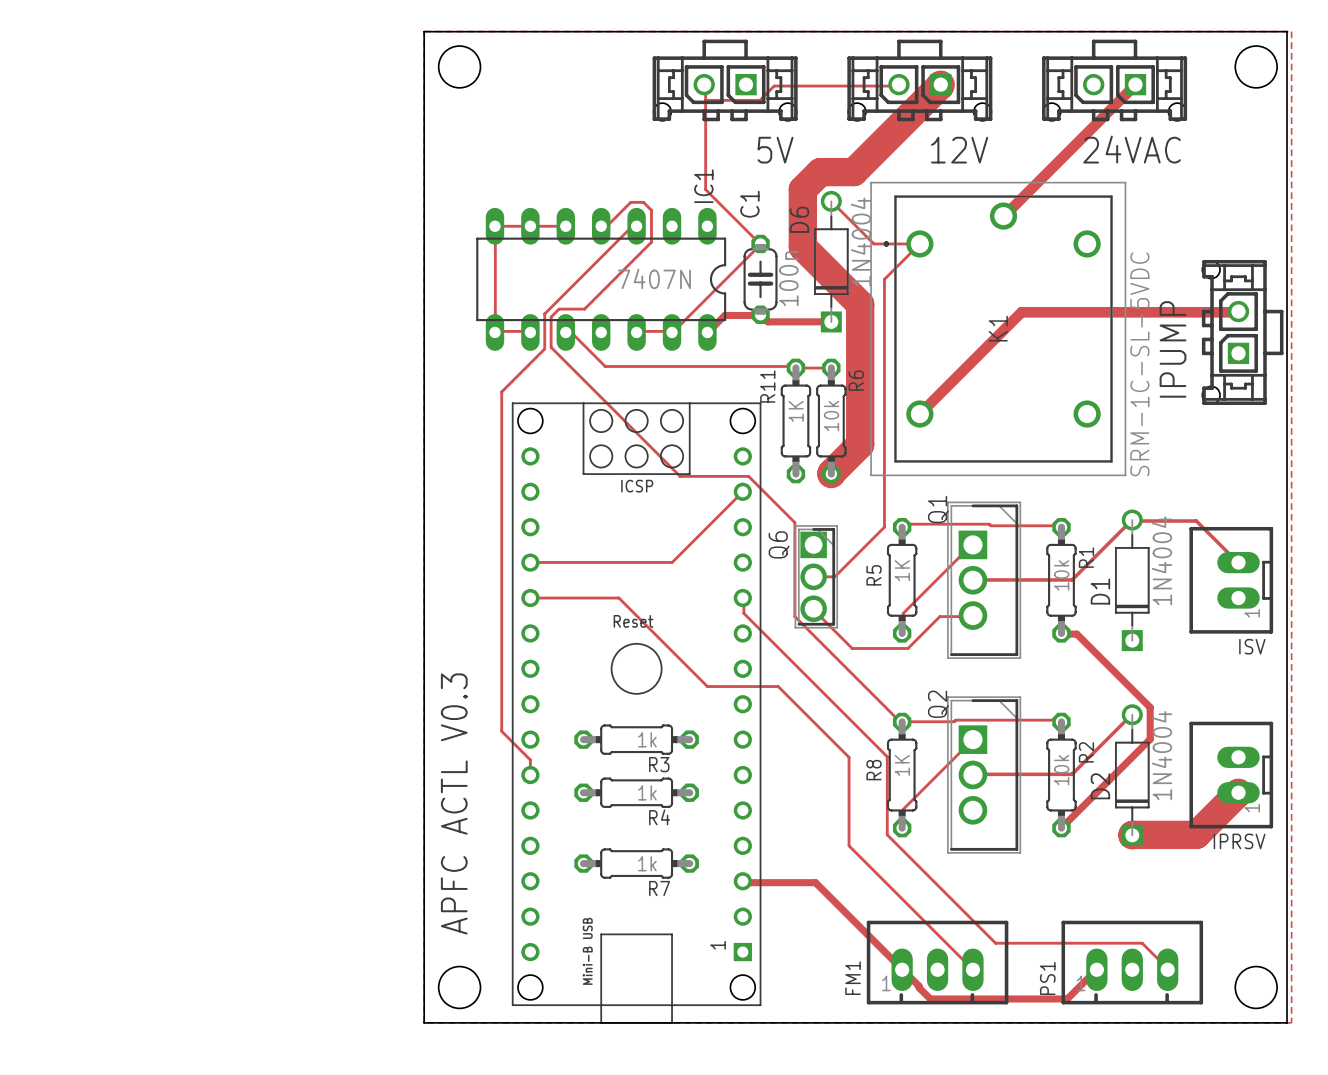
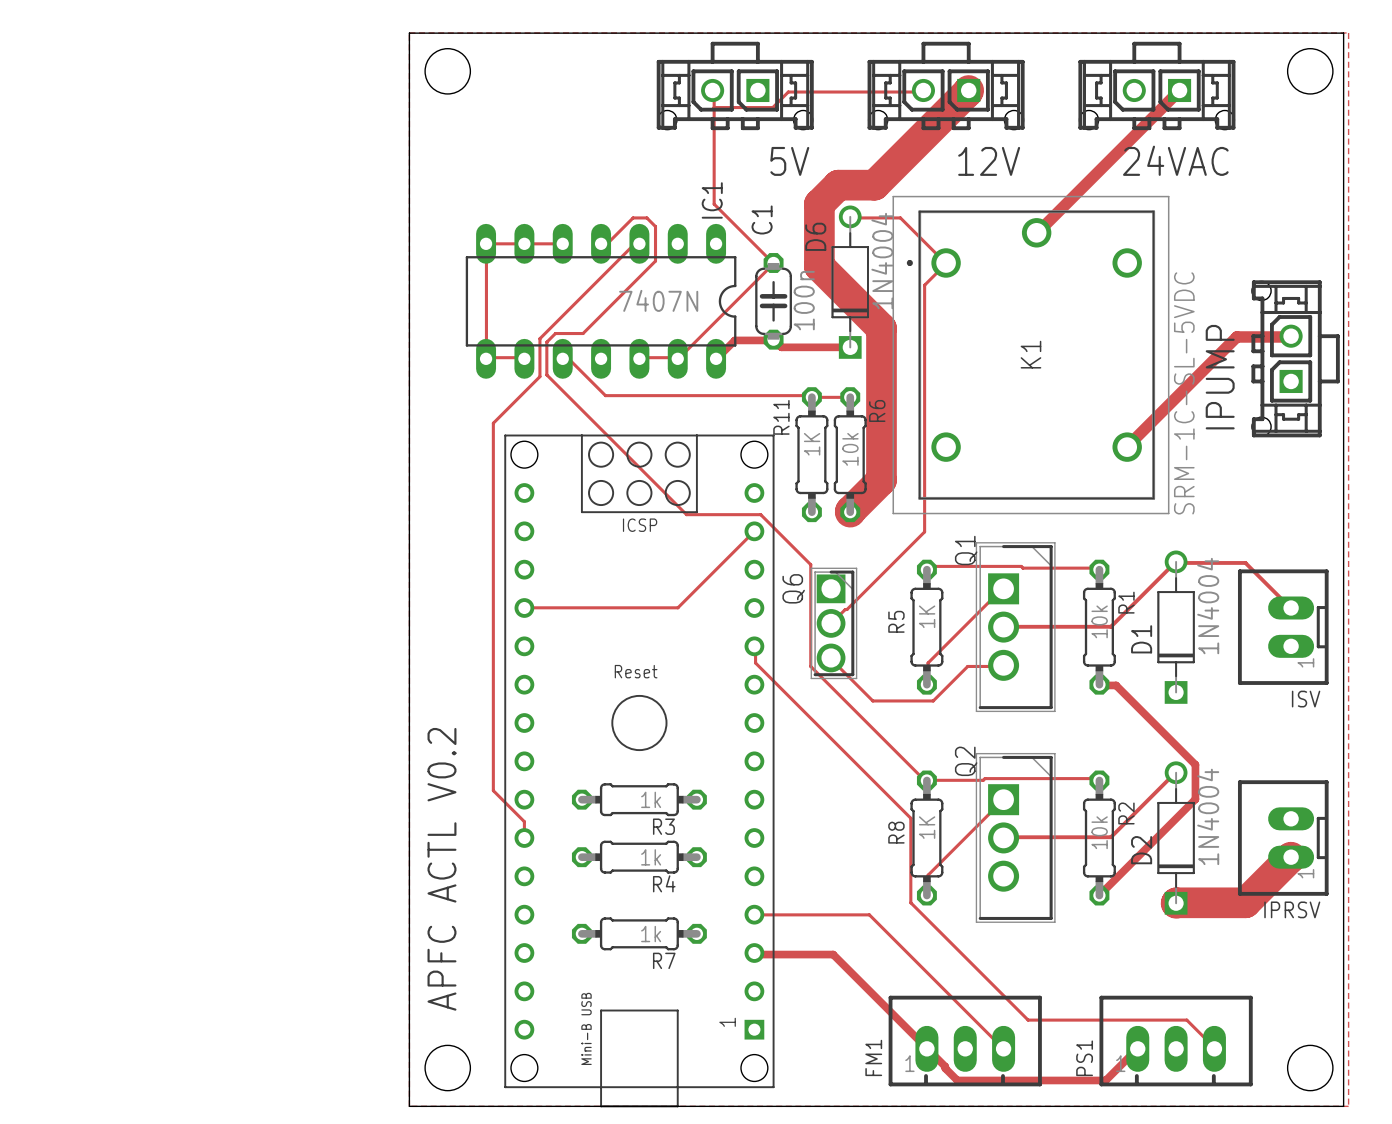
track: (831, 201) (873, 243) (919, 243) (884, 279) (884, 527) (834, 576) (813, 576) -> (850, 216) (900, 217) (946, 262) (924, 285) (924, 531) (831, 623)
track: (1188, 312) (1021, 312) (919, 414) -> (1236, 336) (1127, 447)
track: (530, 598) (618, 598) (707, 686) (778, 686) (849, 757) (849, 845) (972, 969) -> (754, 914) (869, 914) (1003, 1048)
text: APFC ACTL V0.3 (454, 803) -> APFC ACTL V0.2 (441, 869)

